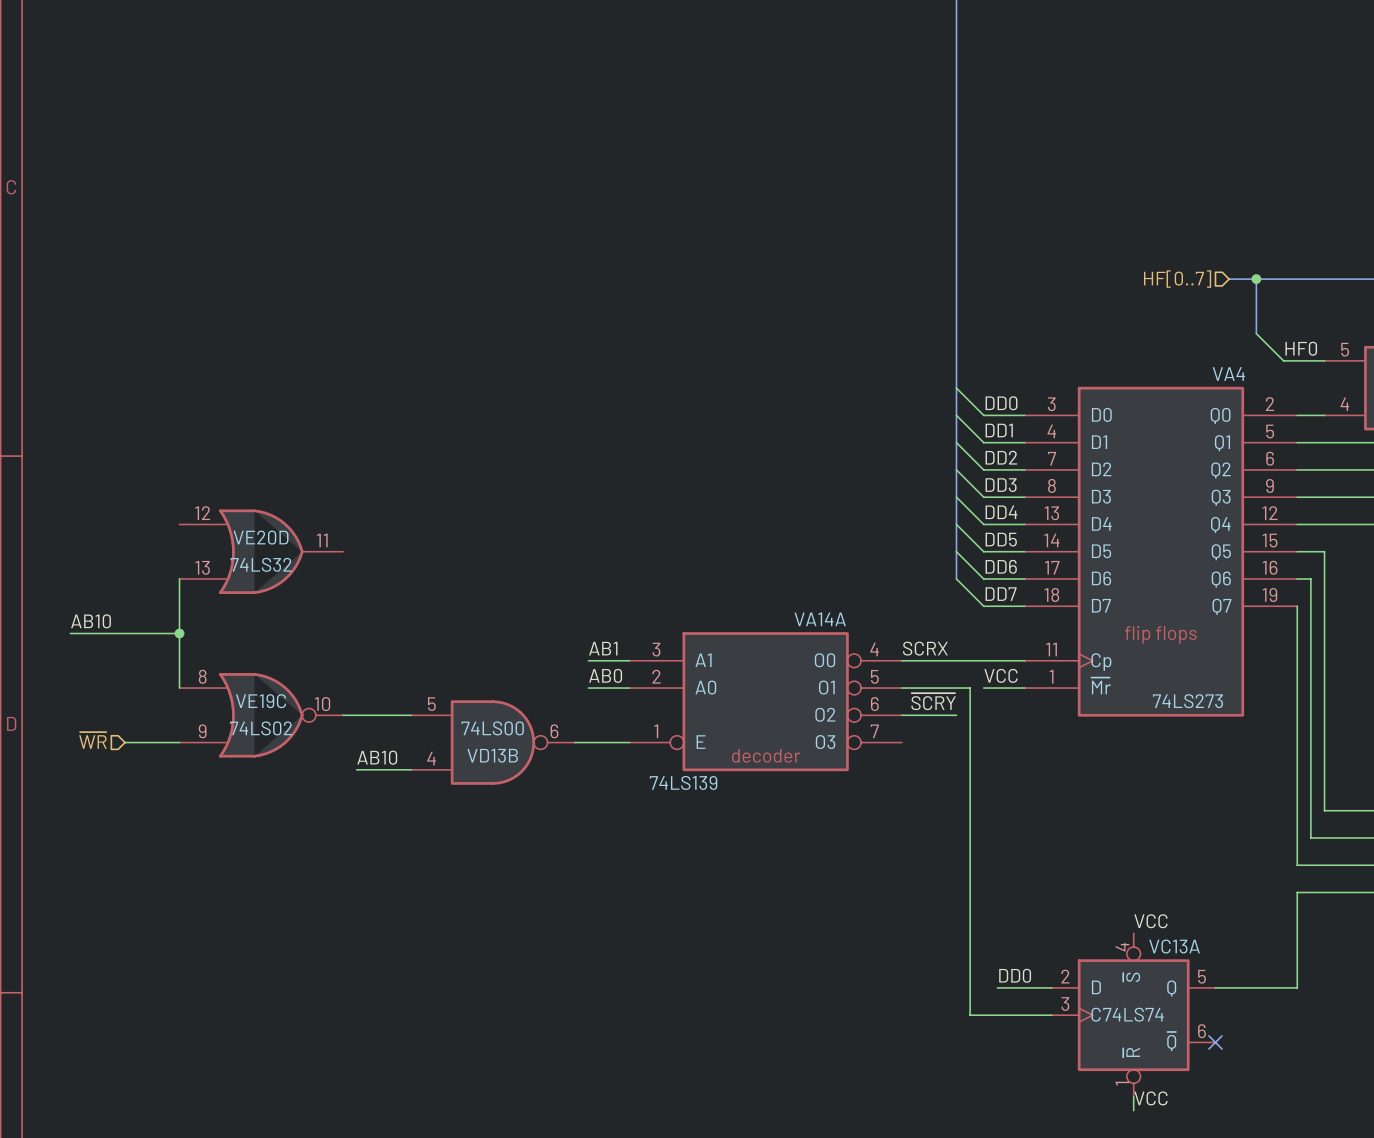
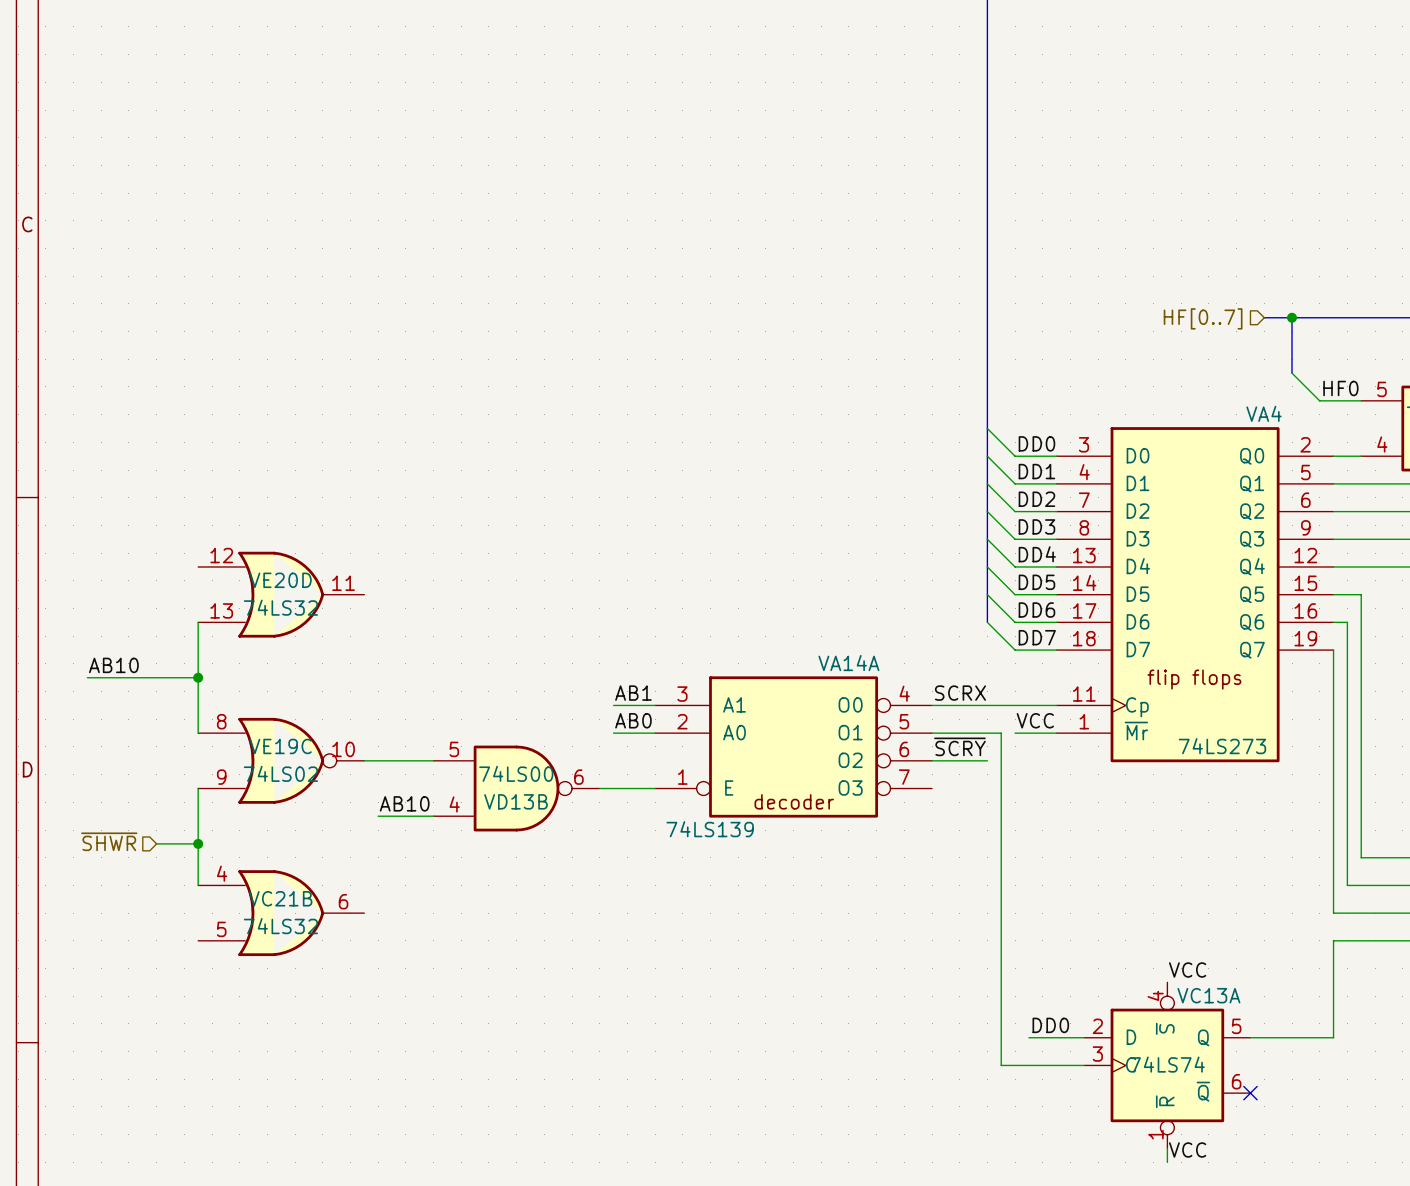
hierarchical label: ~{WR} (92, 740) -> none
wire: (124, 742) (179, 742) -> (198, 885) (198, 788)
hierarchical label: none -> ~{SHWR} (109, 841)
wire: none -> (156, 843) (198, 843)
junction: none -> (198, 843)
VC21B: none -> 74LS32 (281, 913)

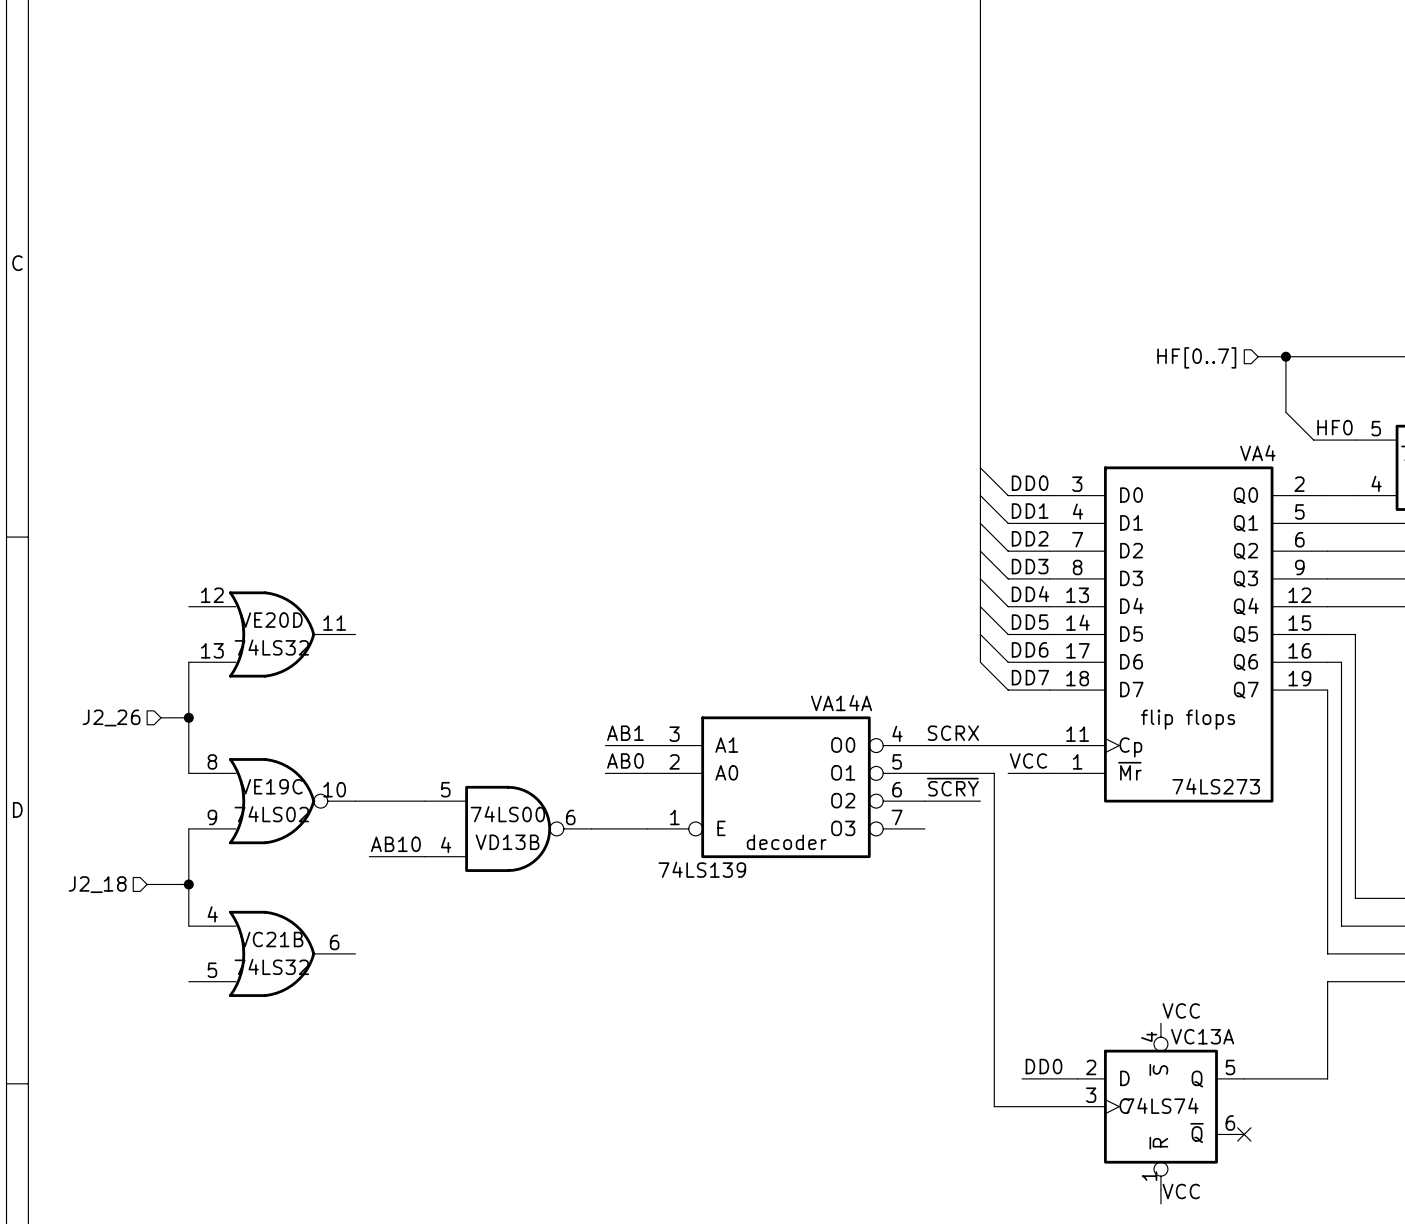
label: AB10 (113, 665) -> none
wire: (87, 677) (170, 677) -> none
hierarchical label: none -> J2_26 (111, 717)
hierarchical label: ~{SHWR} (109, 841) -> J2_18 (97, 884)

